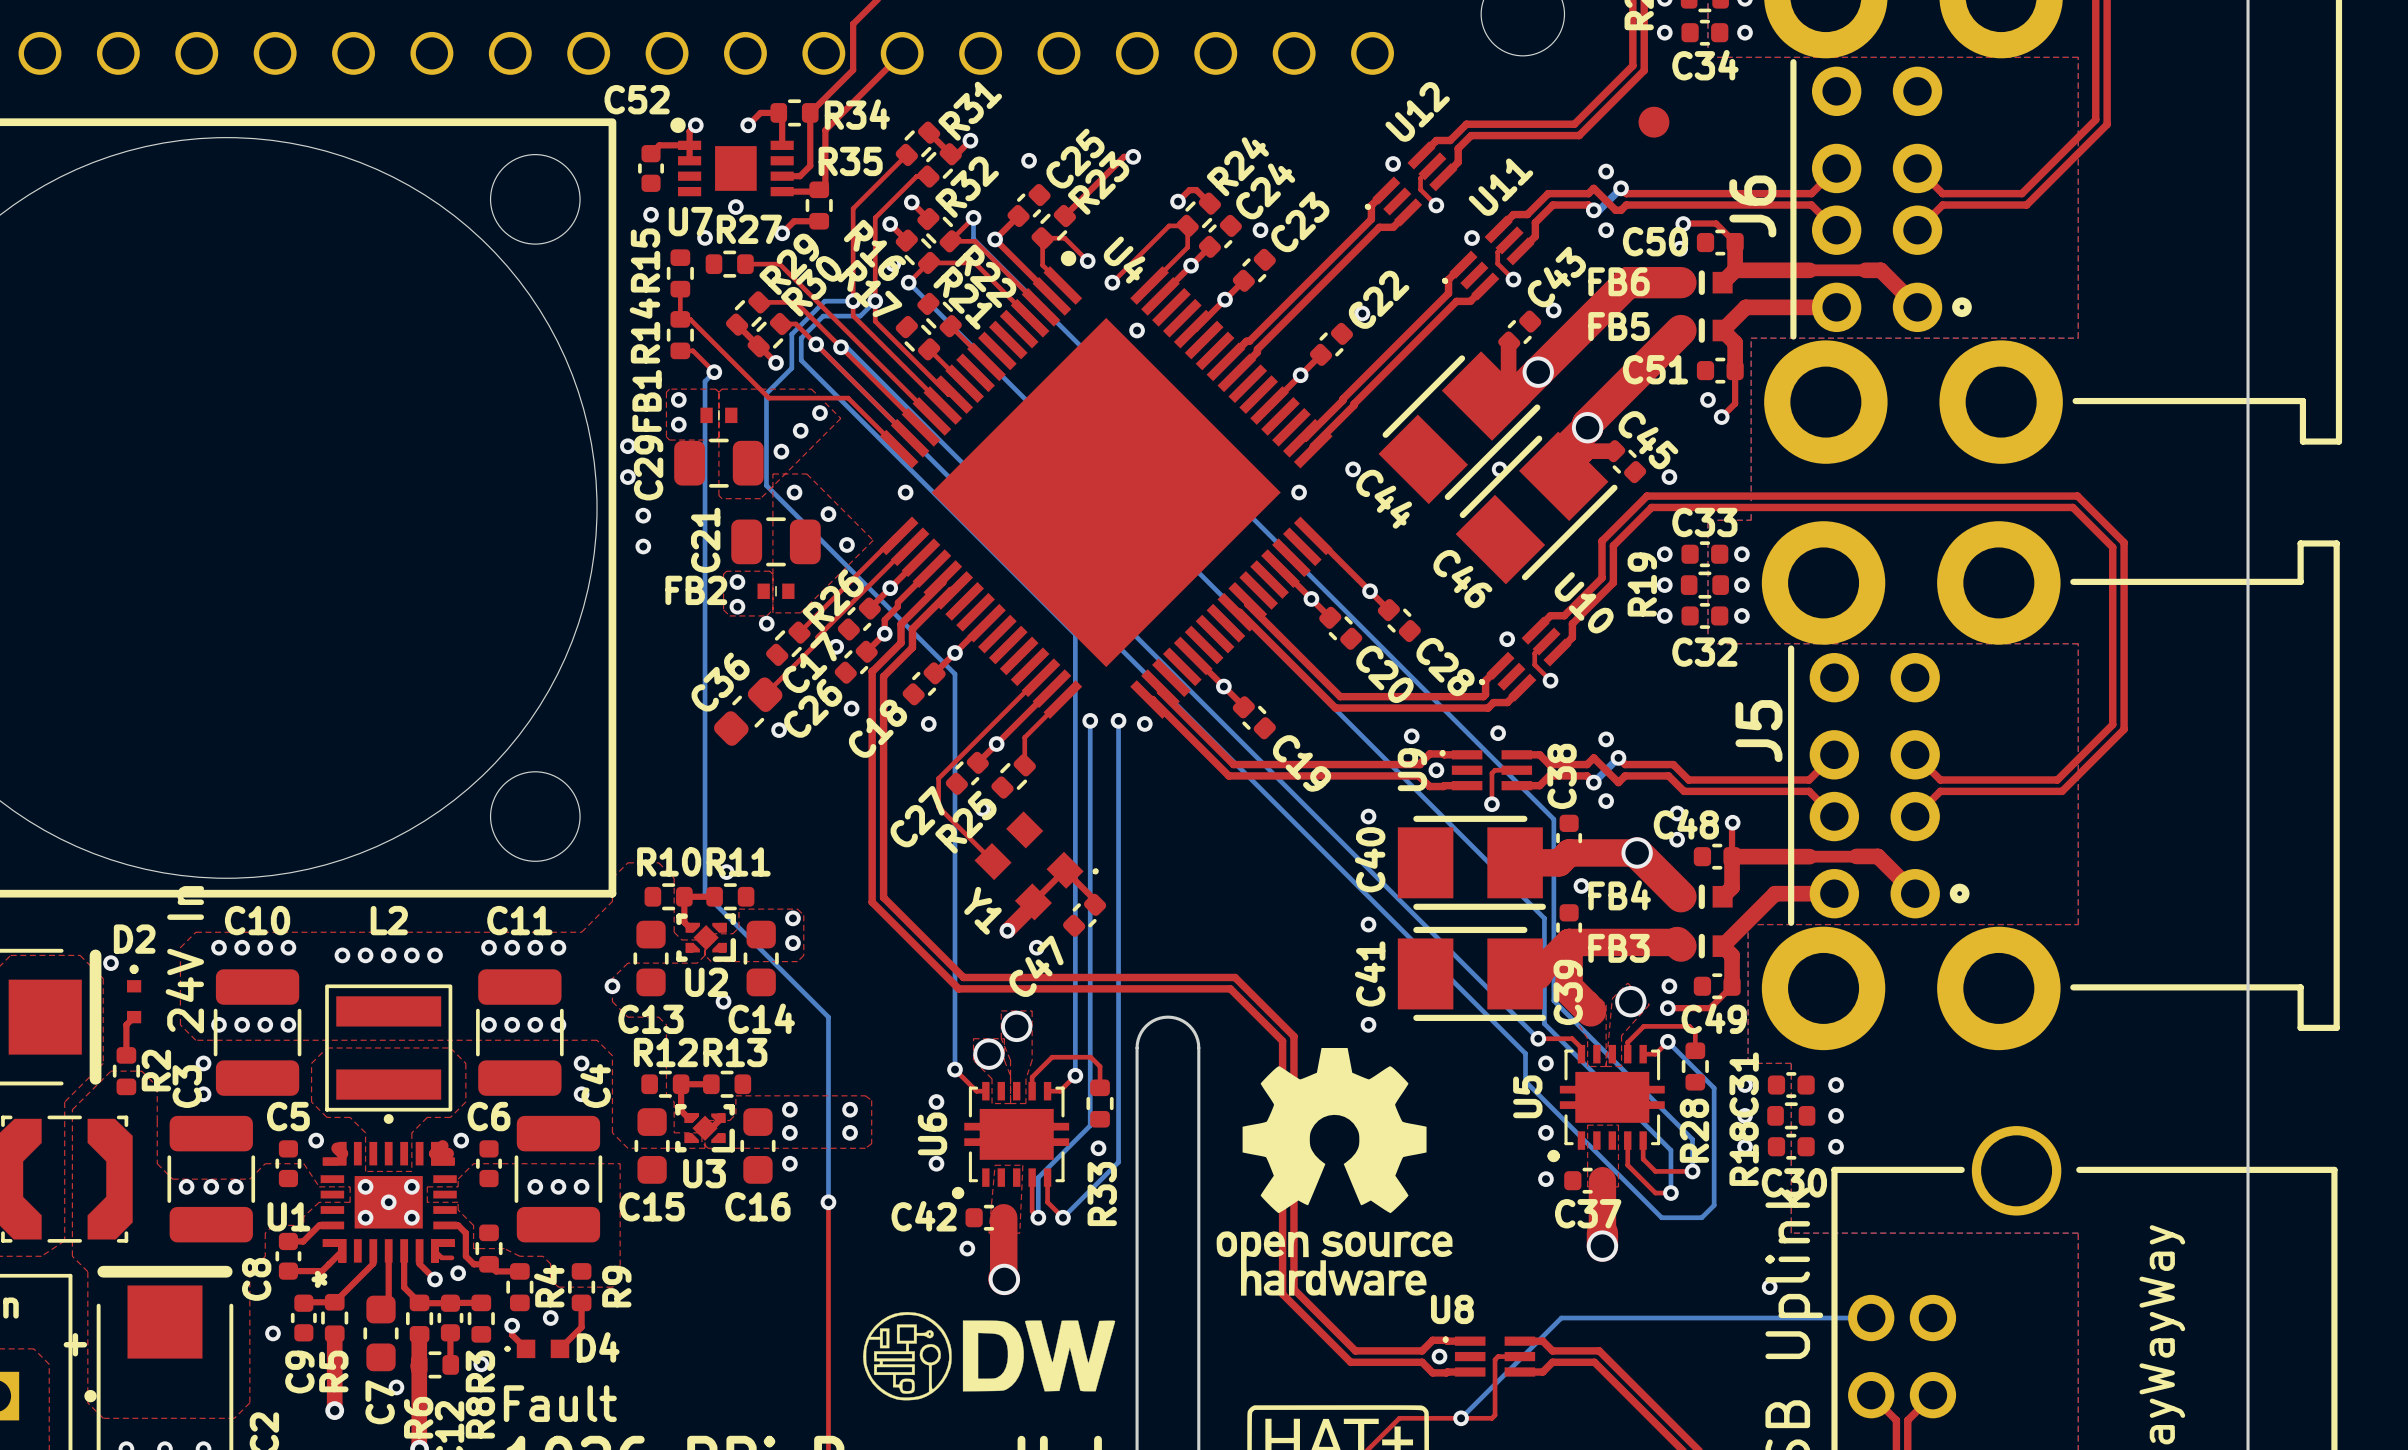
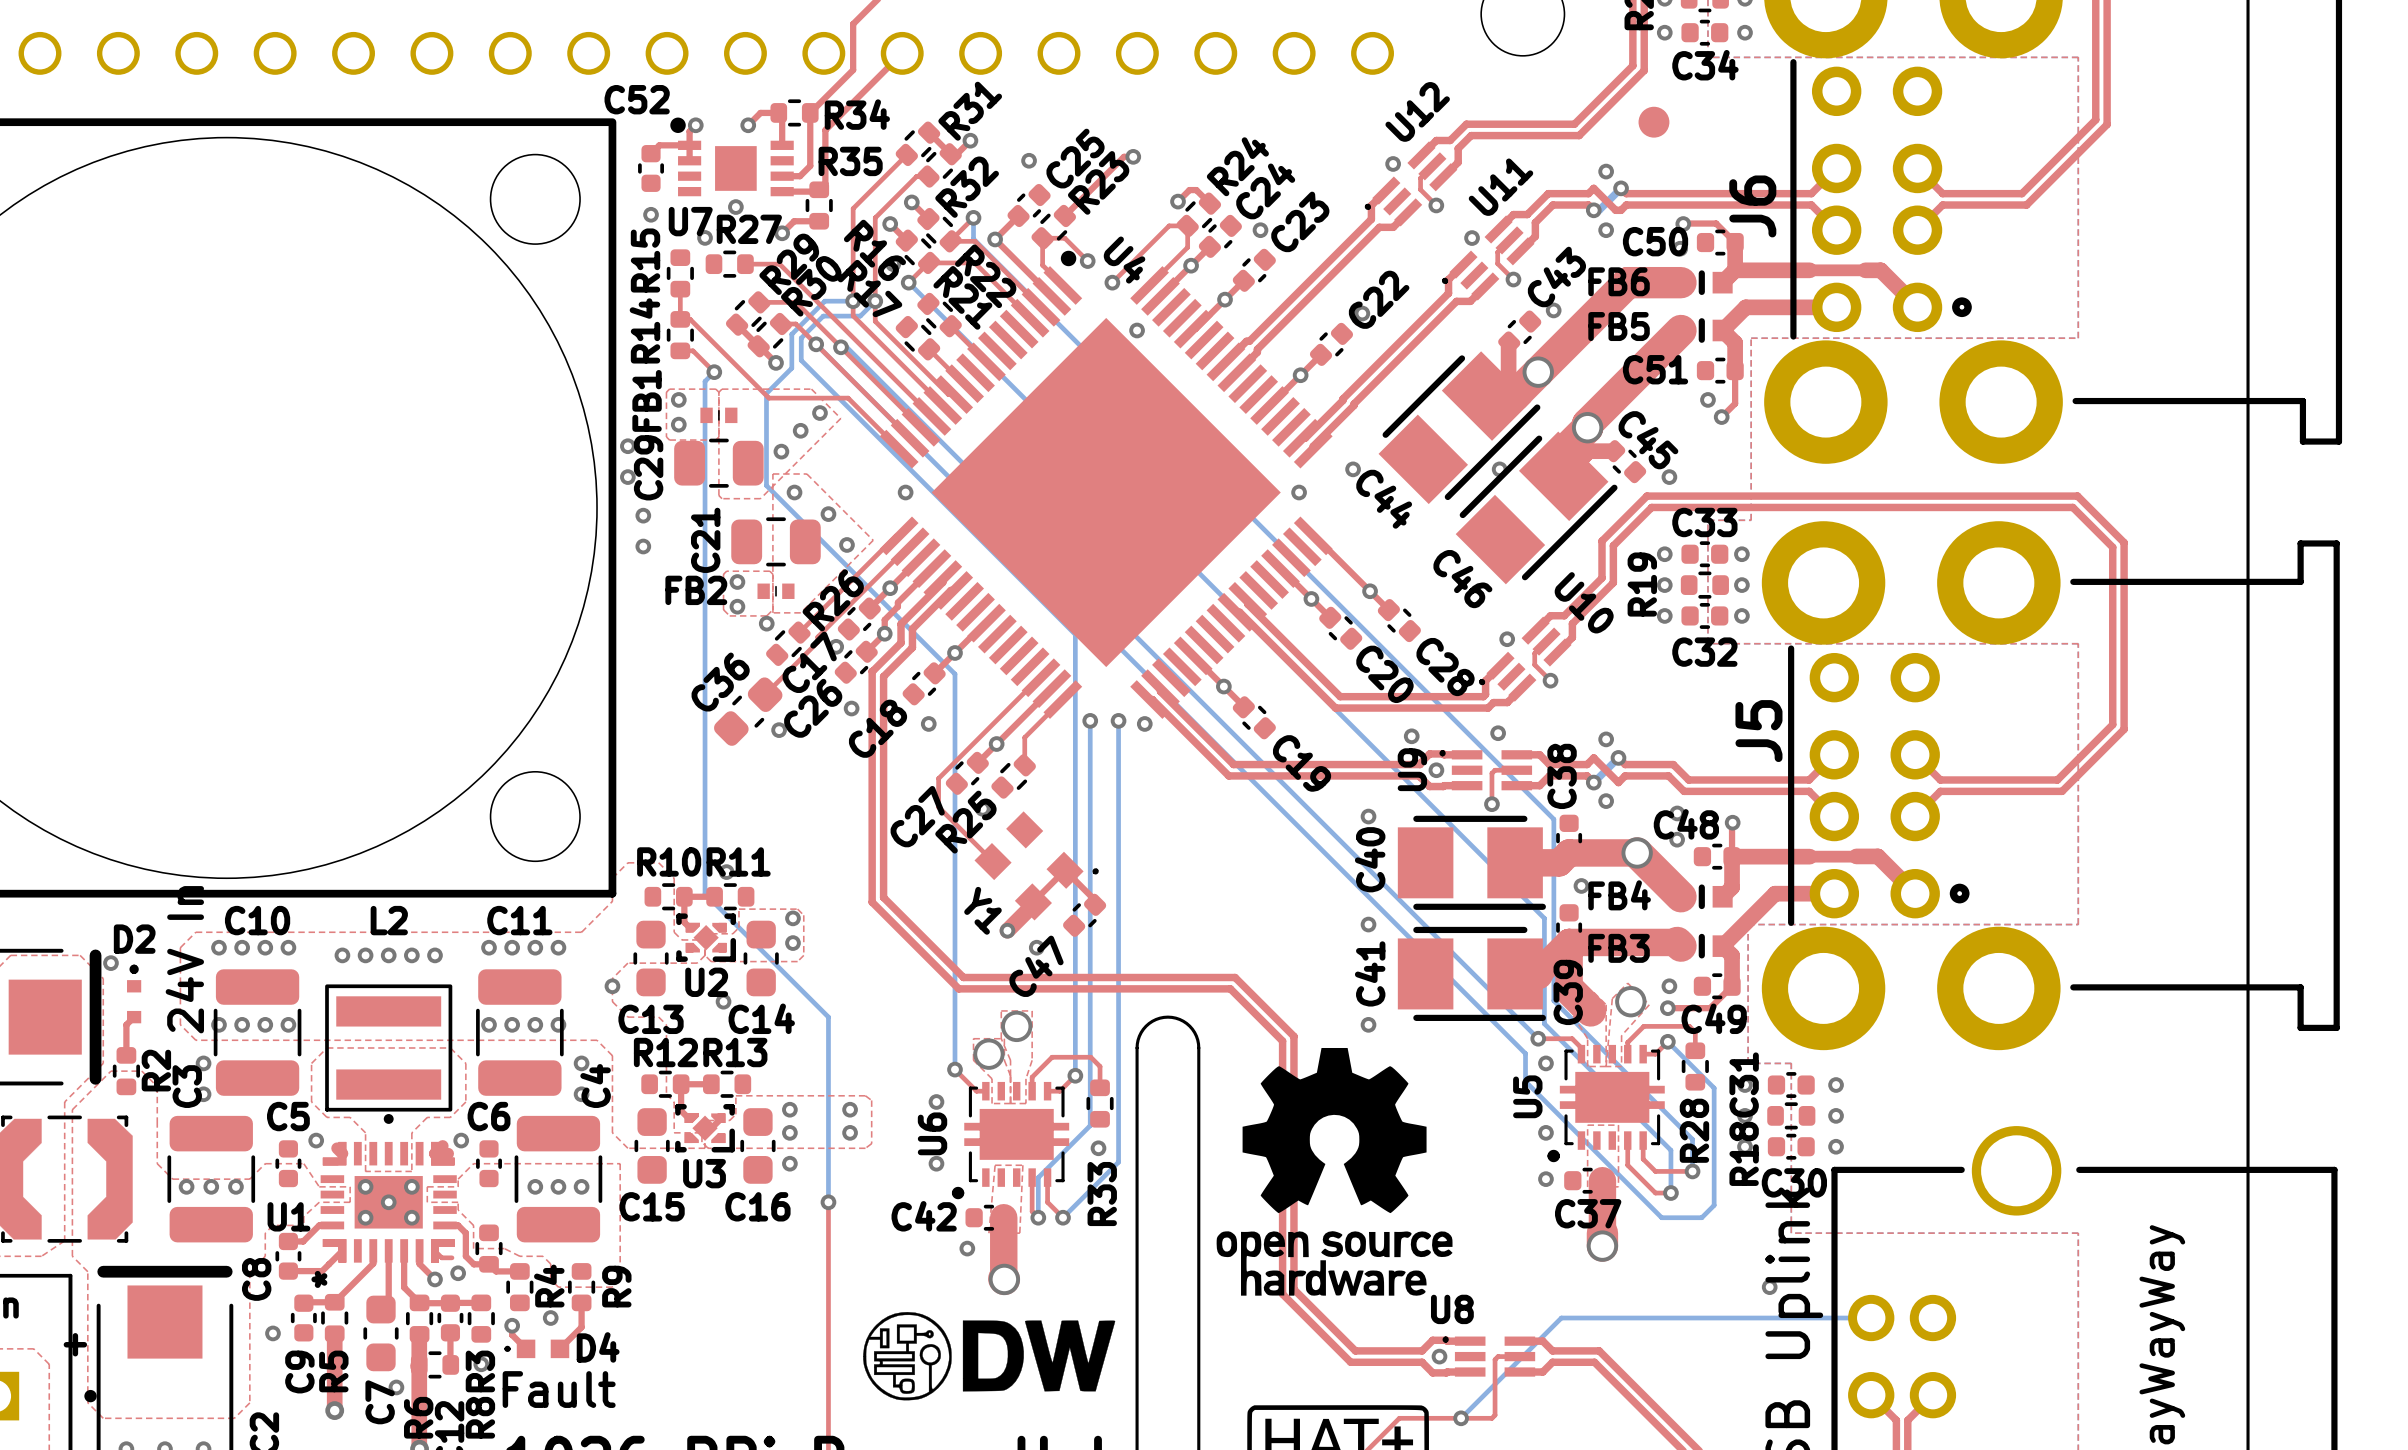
text position: Fault (560, 1403) -> Fault (559, 1389)

